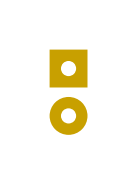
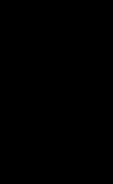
part: (68, 92) -> none

